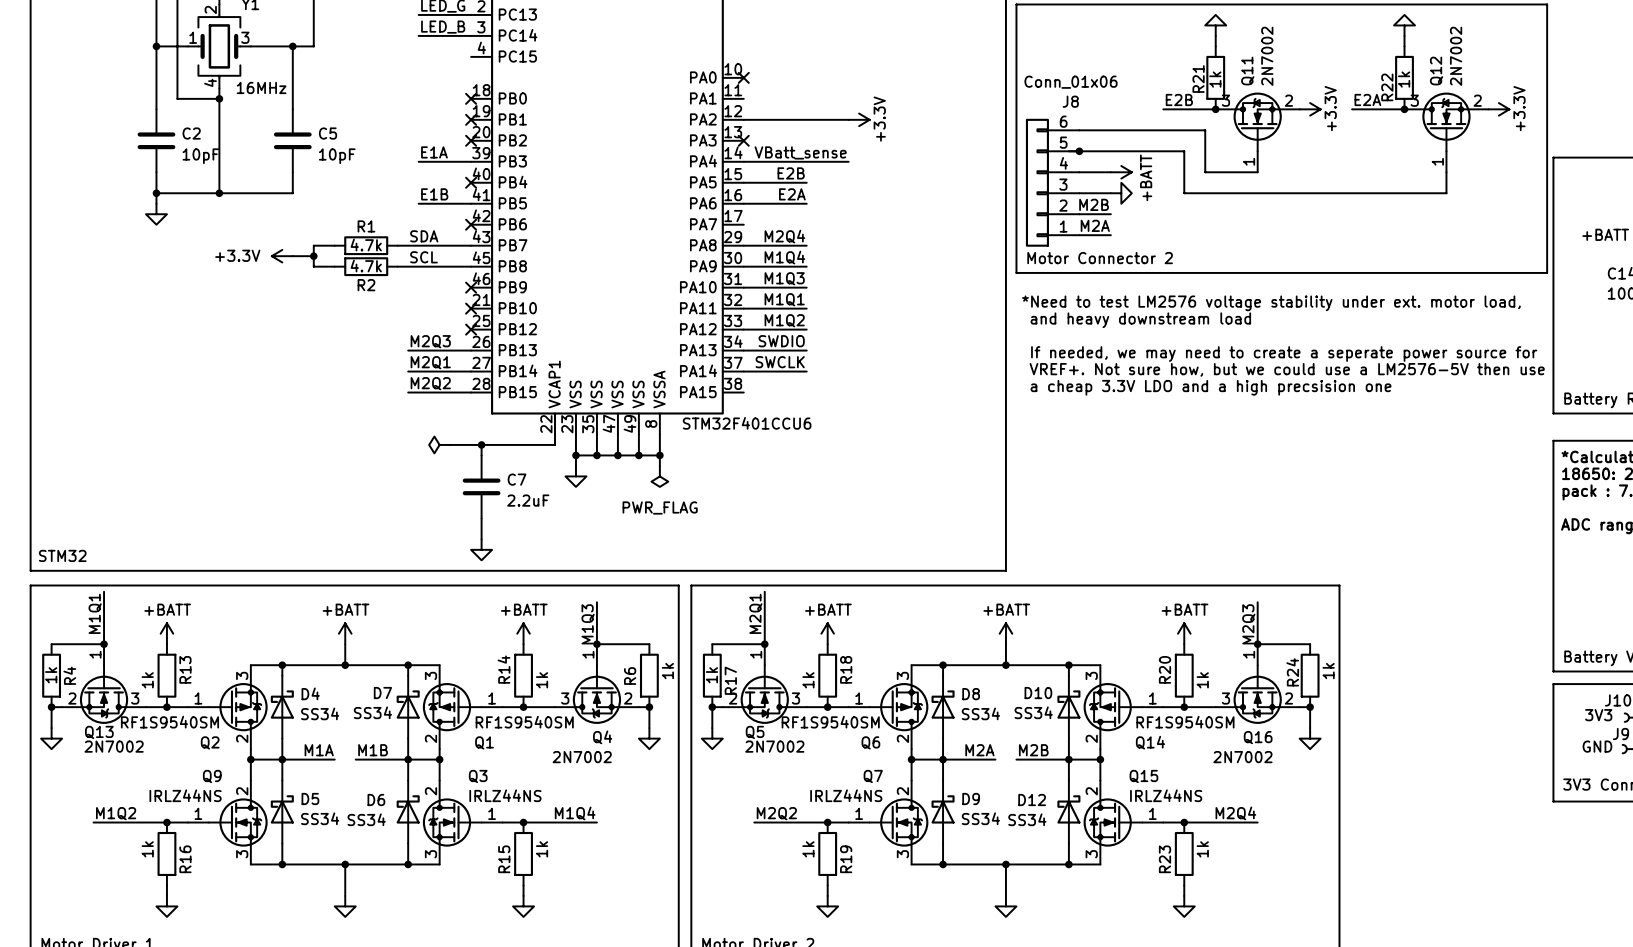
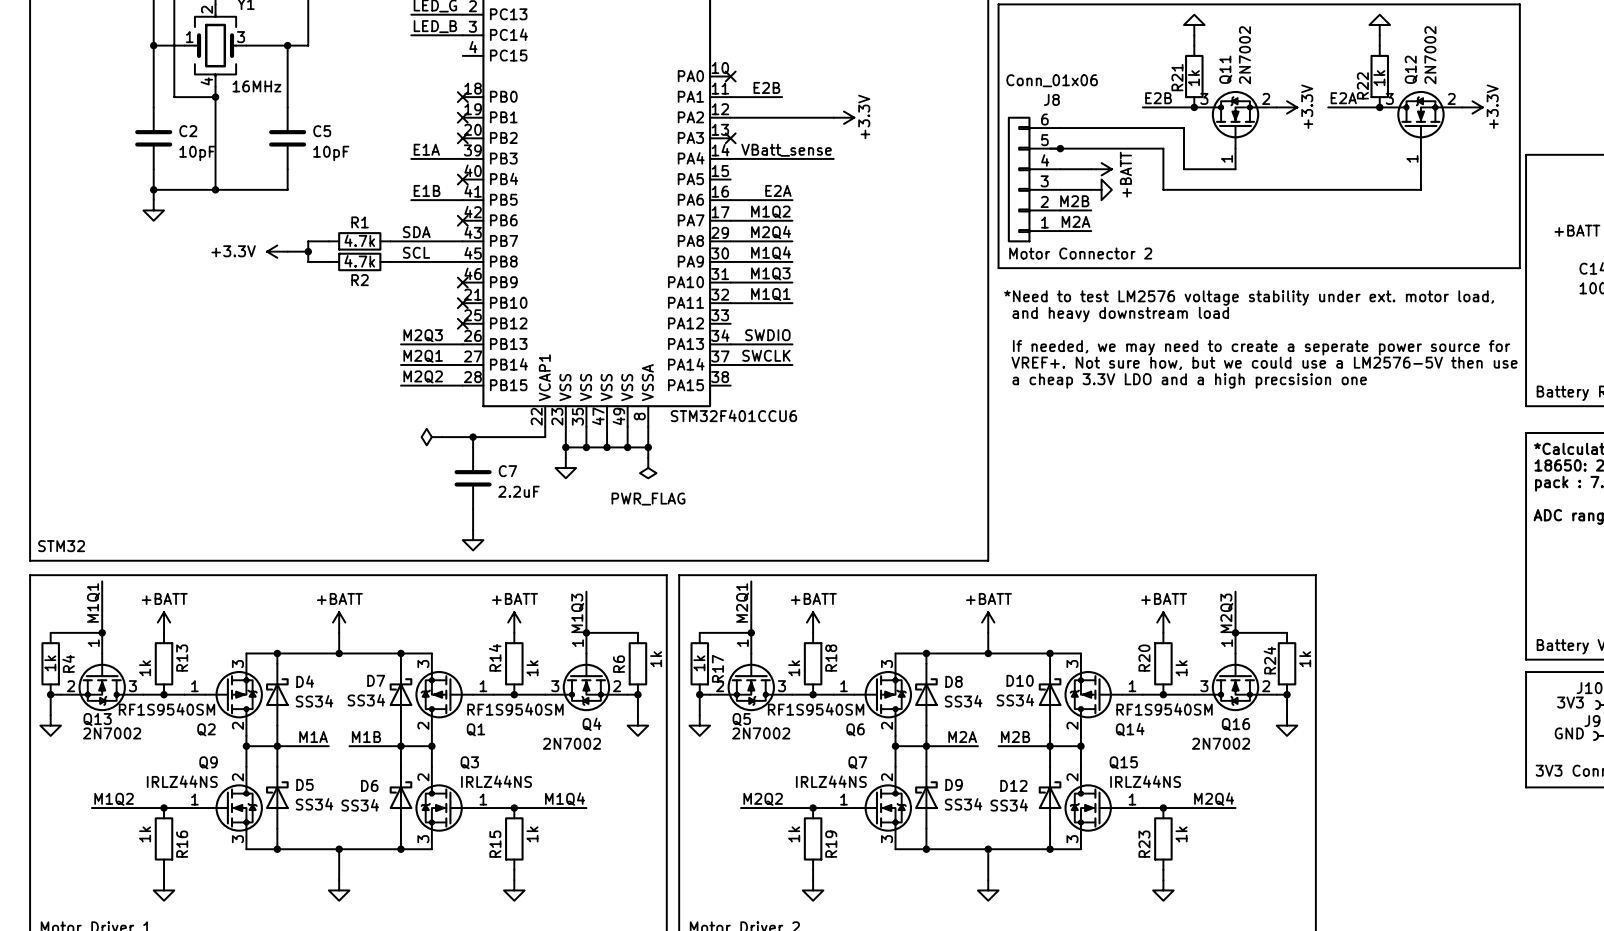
wire: none -> (730, 97) (782, 97)
label position: E2B (791, 173) -> E2B (766, 87)
wire: (743, 182) (806, 182) -> (730, 220) (792, 220)
label position: M1Q2 (784, 320) -> M1Q2 (770, 212)
wire: (743, 329) (806, 329) -> none

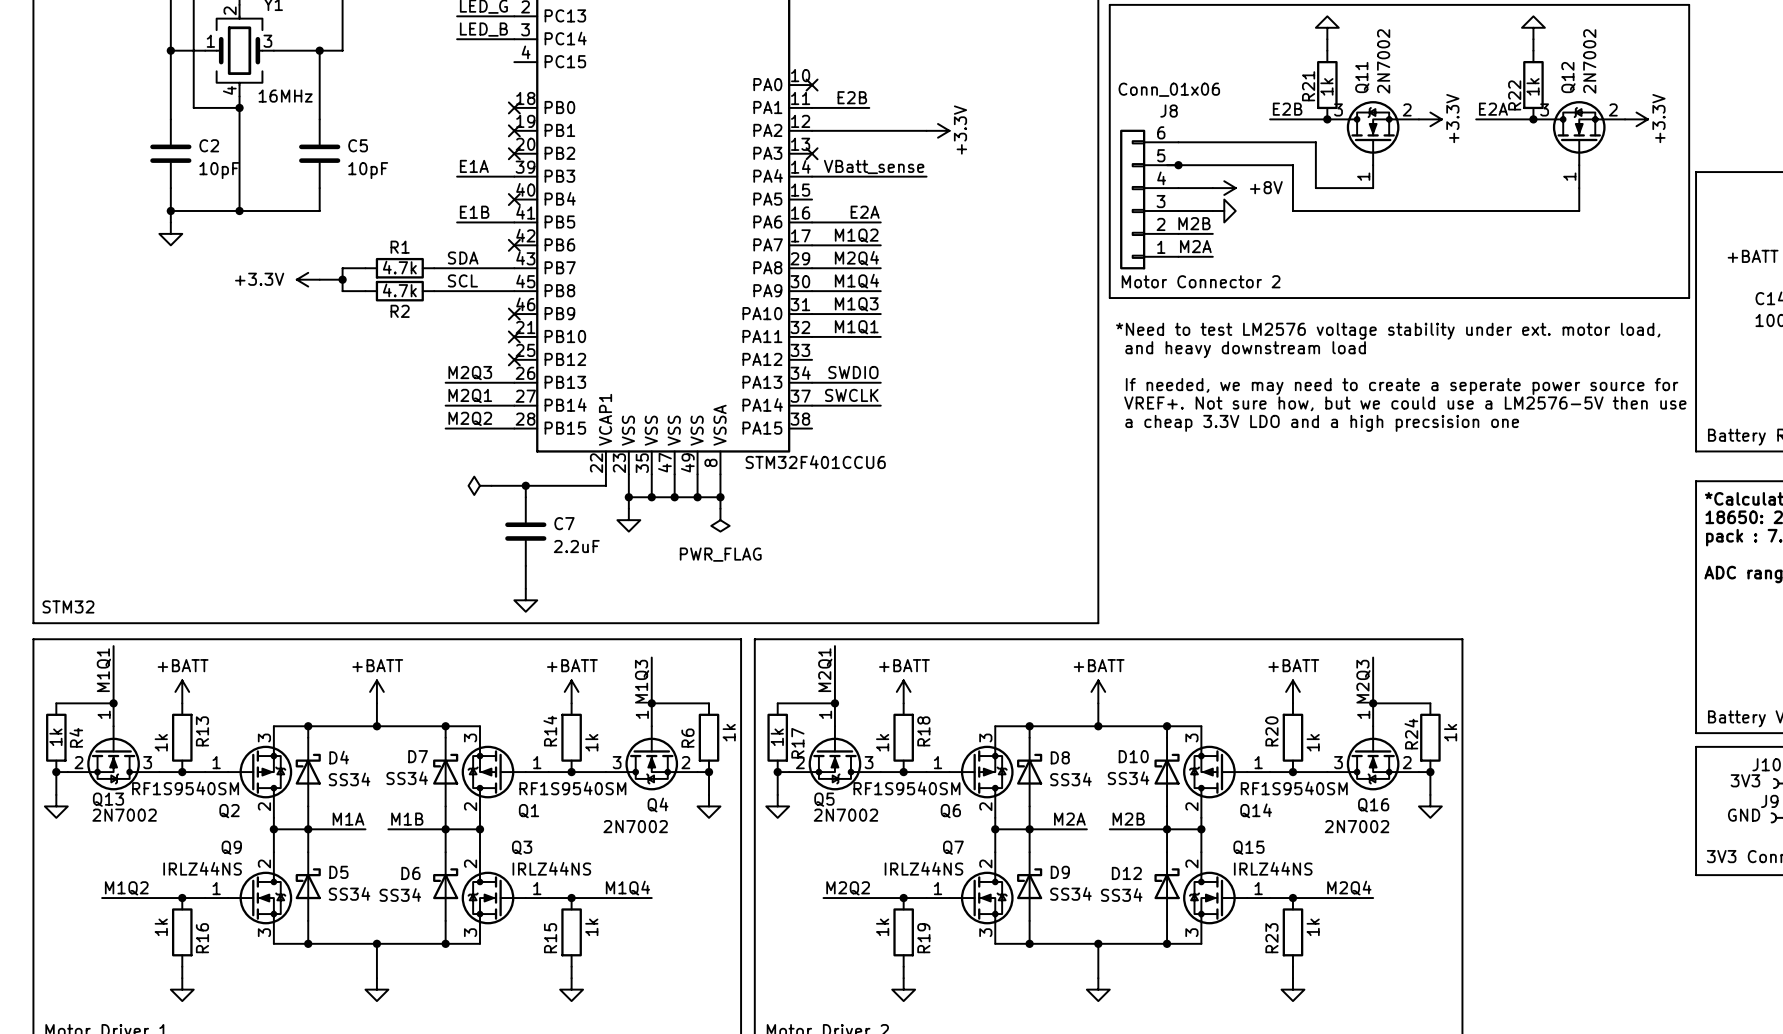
power symbol: +BATT (1101, 169) -> +8V (1224, 188)

